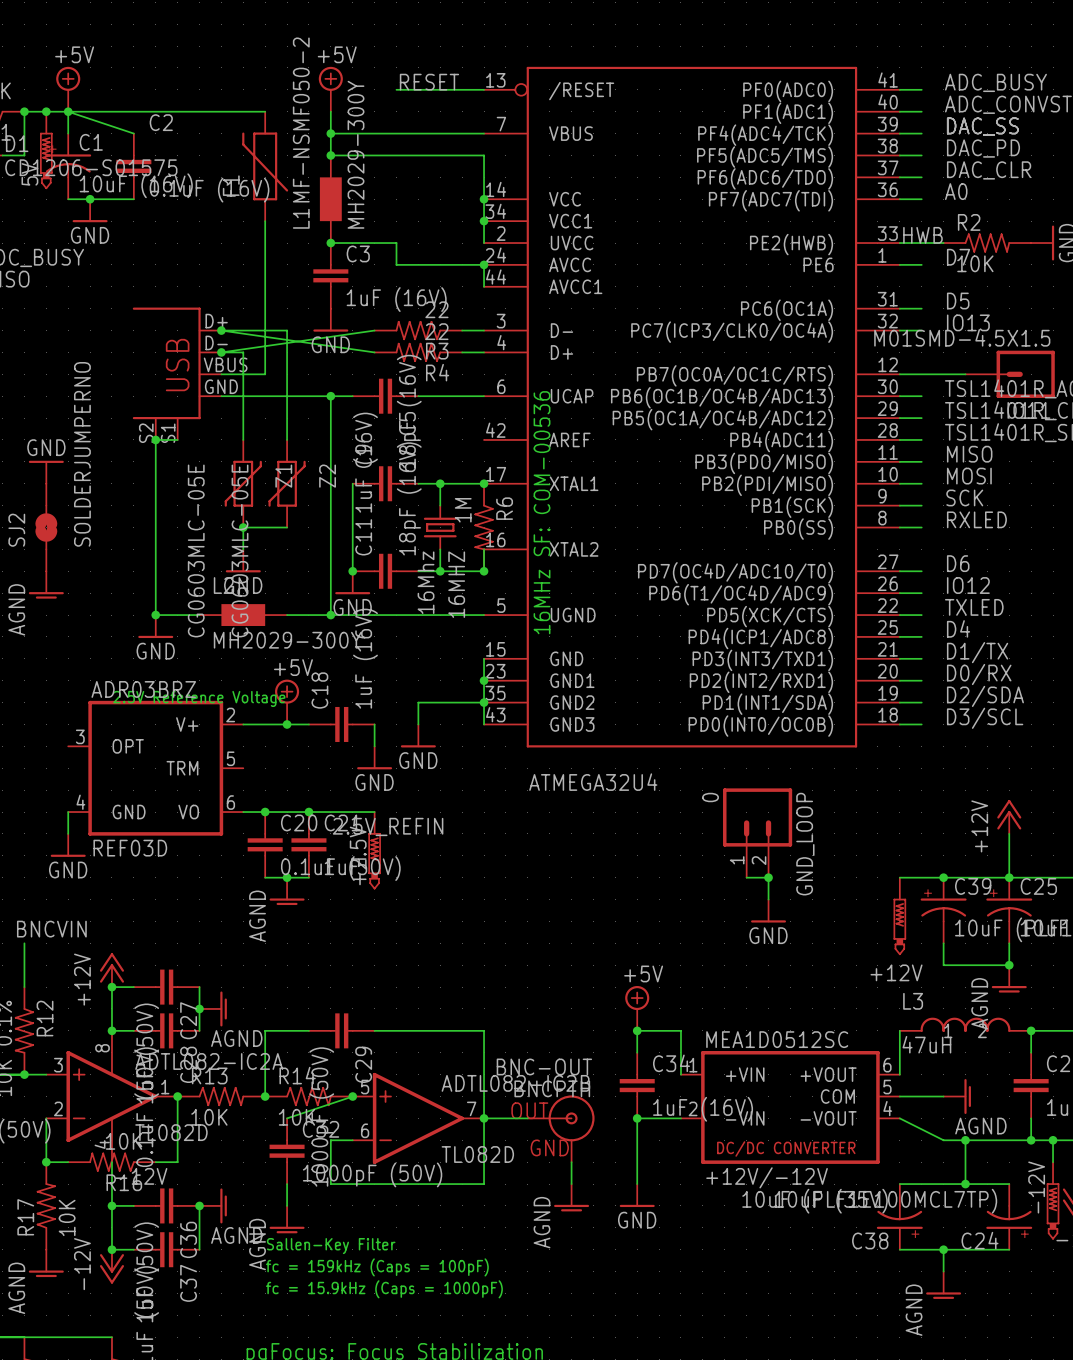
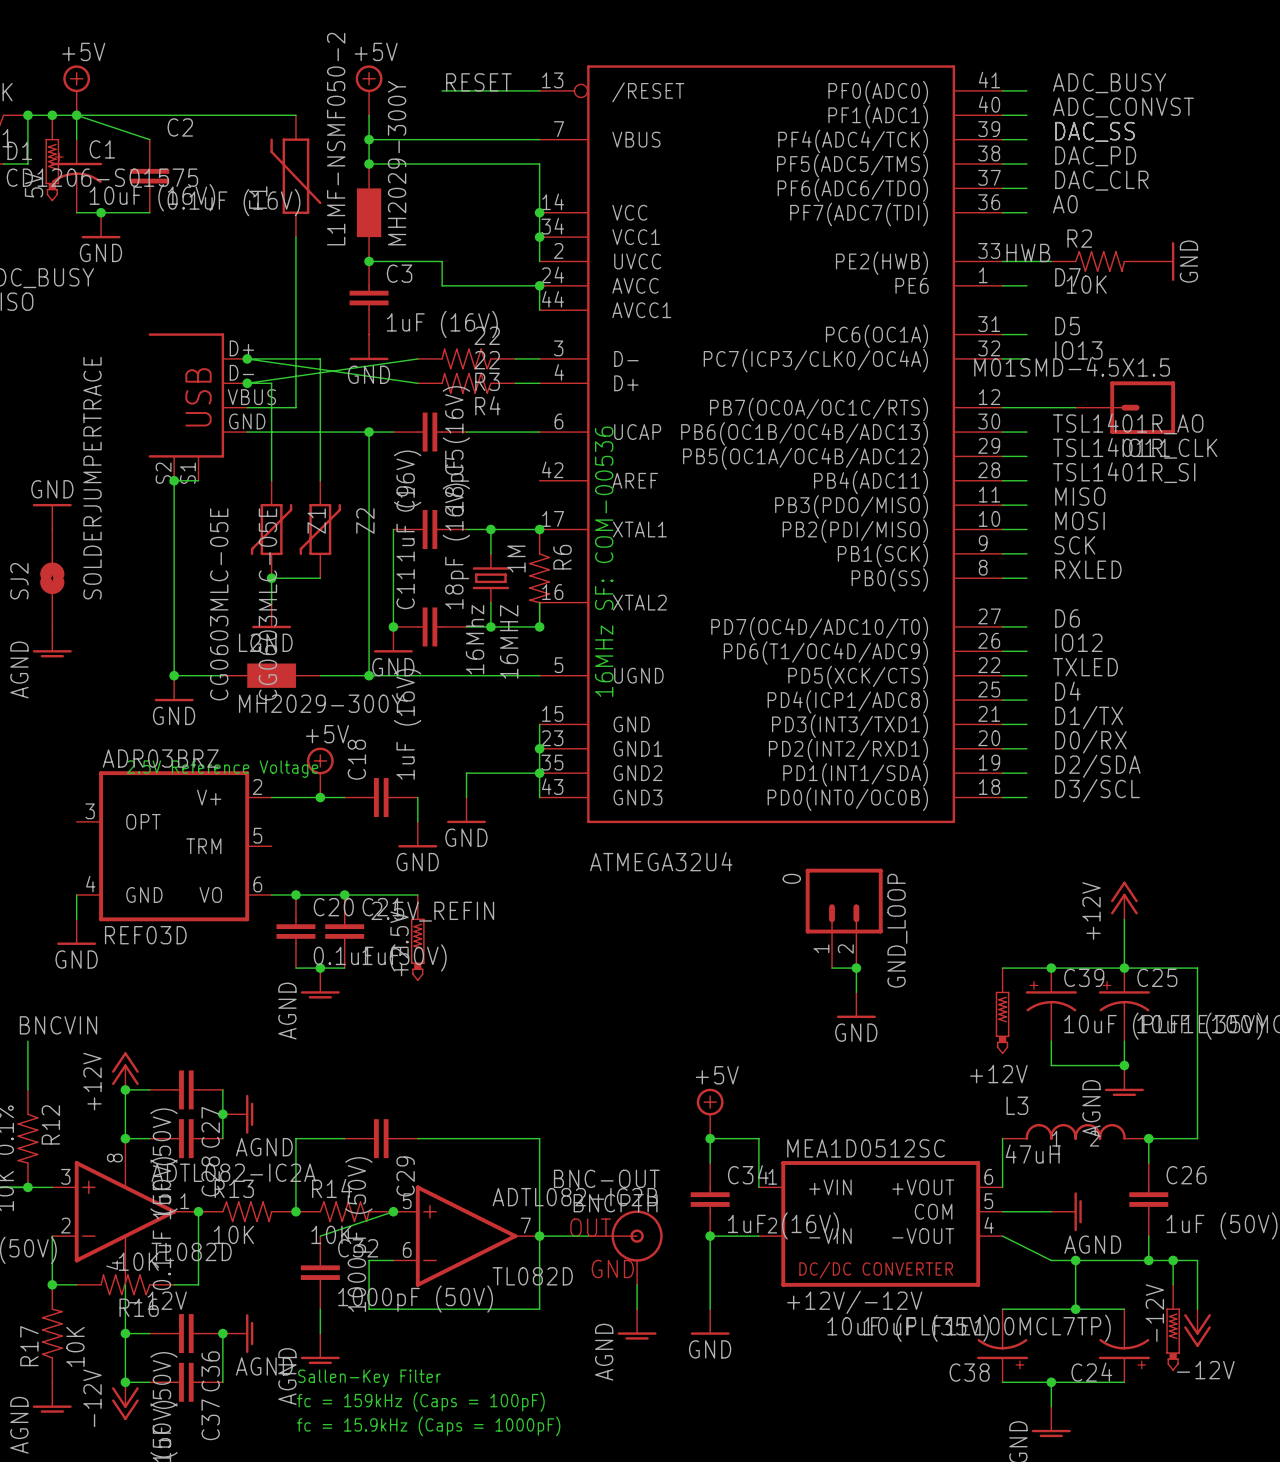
SJ2 value: SOLDERJUMPERNO (82, 454) -> SOLDERJUMPERTRACE (92, 478)

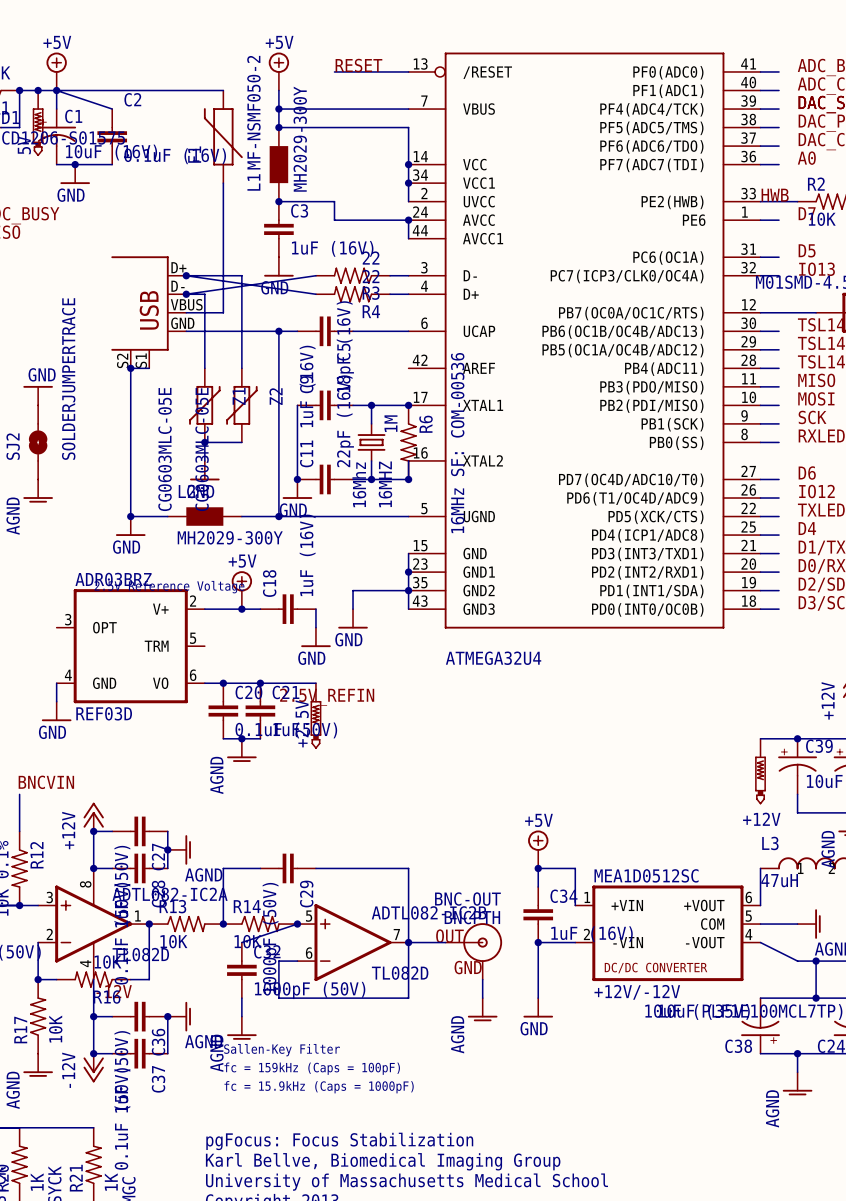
C11 value: 18pF (16V) (456, 546) -> 22pF (16V) (345, 421)
GND_LOOP: 0 (844, 918) -> none
wire: (832, 968) (856, 968) (856, 992) -> none
junction: (856, 968) -> none
power symbol: GND (856, 1005) -> none

